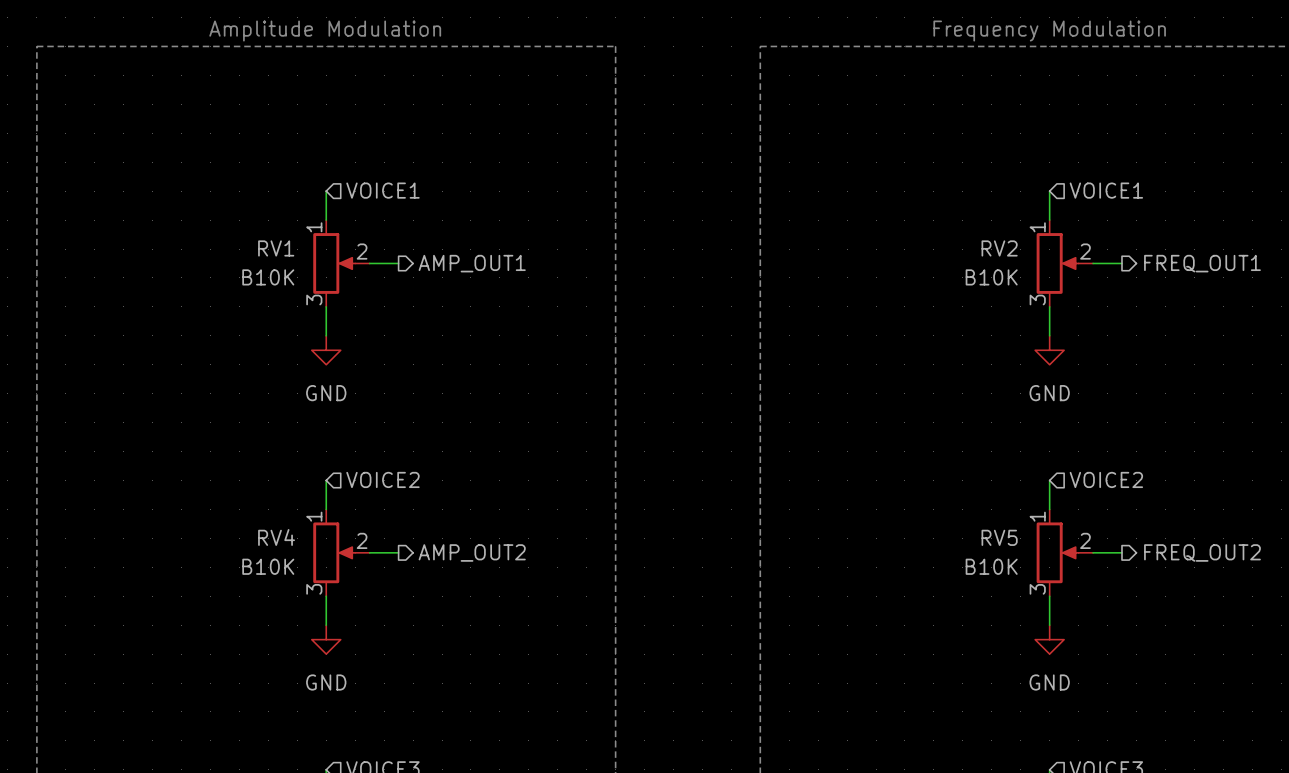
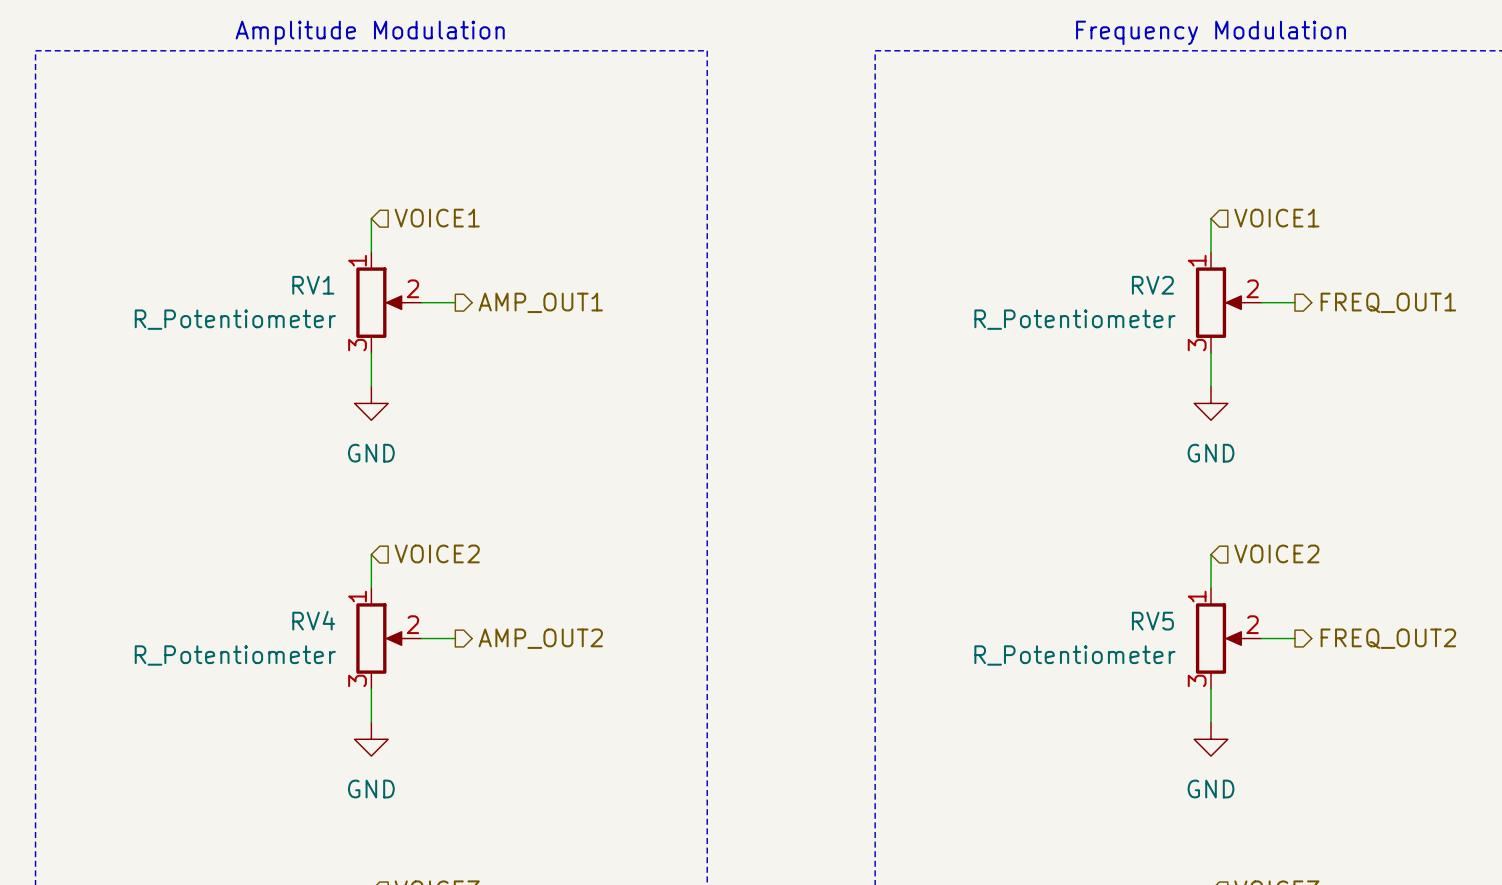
RV1 value: B10K (268, 277) -> R_Potentiometer (235, 319)
RV2 value: B10K (991, 277) -> R_Potentiometer (1074, 319)
RV4 value: B10K (268, 566) -> R_Potentiometer (235, 655)
RV5 value: B10K (991, 566) -> R_Potentiometer (1074, 655)

